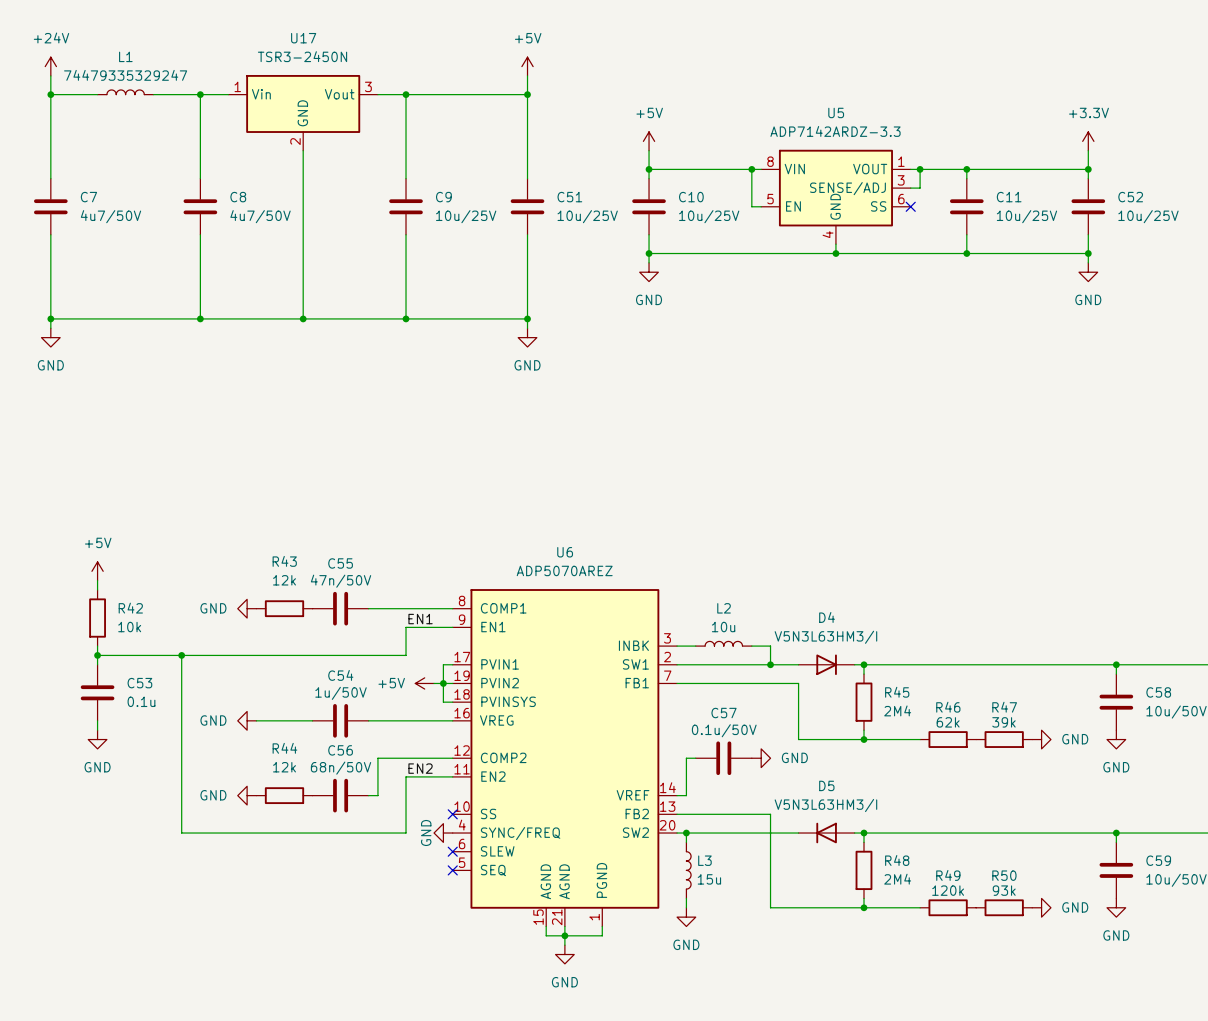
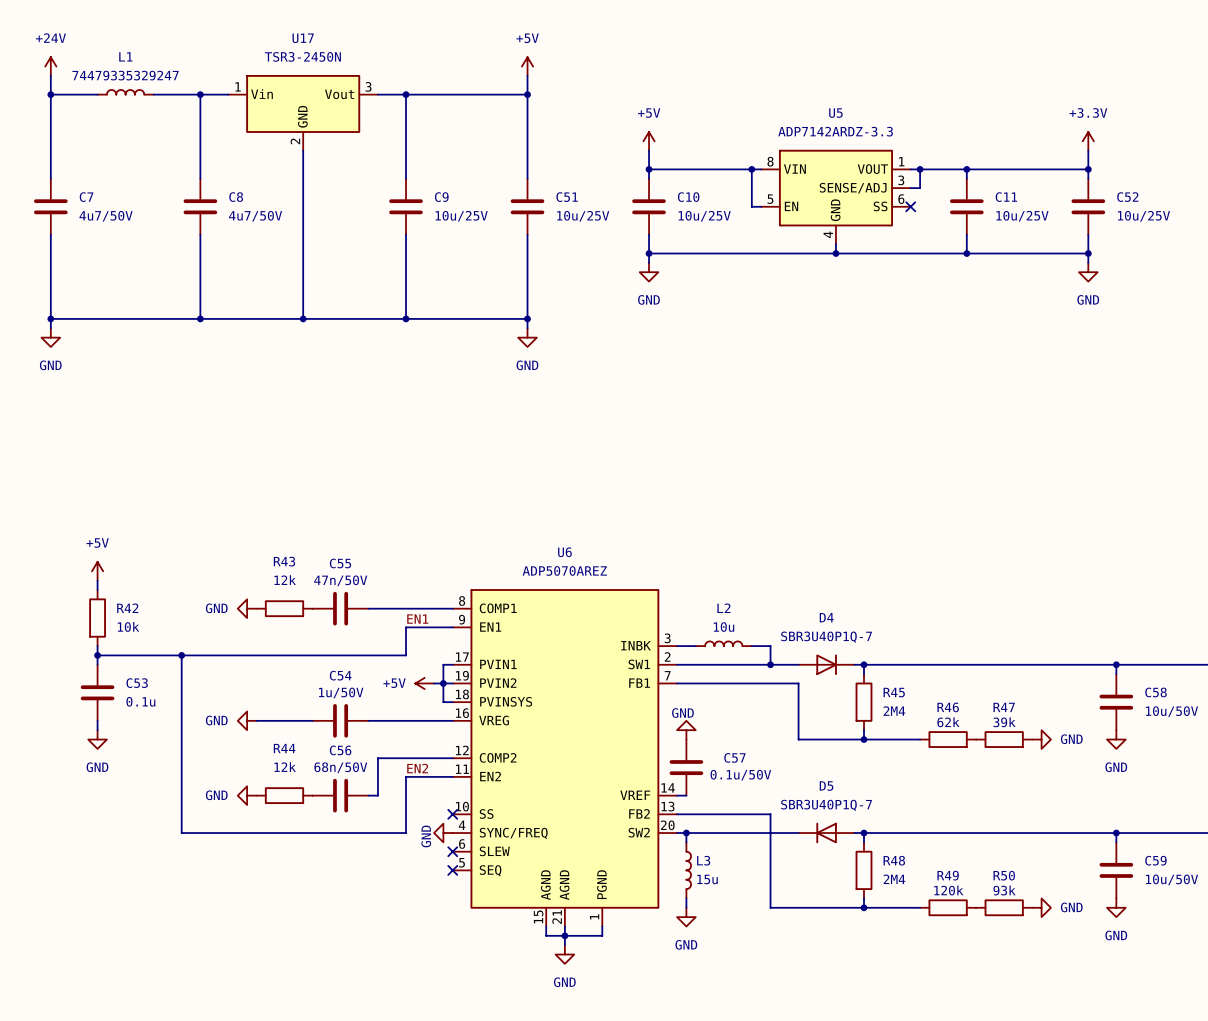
D4 value: V5N3L63HM3/I (825, 637) -> SBR3U40P1Q-7 (826, 637)
C57 value position: 0.1u/50V (724, 730) -> 0.1u/50V (740, 775)
power symbol text position: GND (794, 757) -> GND (682, 713)
C57 rotation: 0° (723, 758) -> 90° clockwise (686, 767)
C57 position: (723, 758) -> (686, 767)
power symbol rotation: 0° (761, 758) -> 90° counterclockwise (686, 730)
power symbol position: GND (761, 758) -> GND (686, 730)
D5 value: V5N3L63HM3/I (825, 805) -> SBR3U40P1Q-7 (826, 805)

